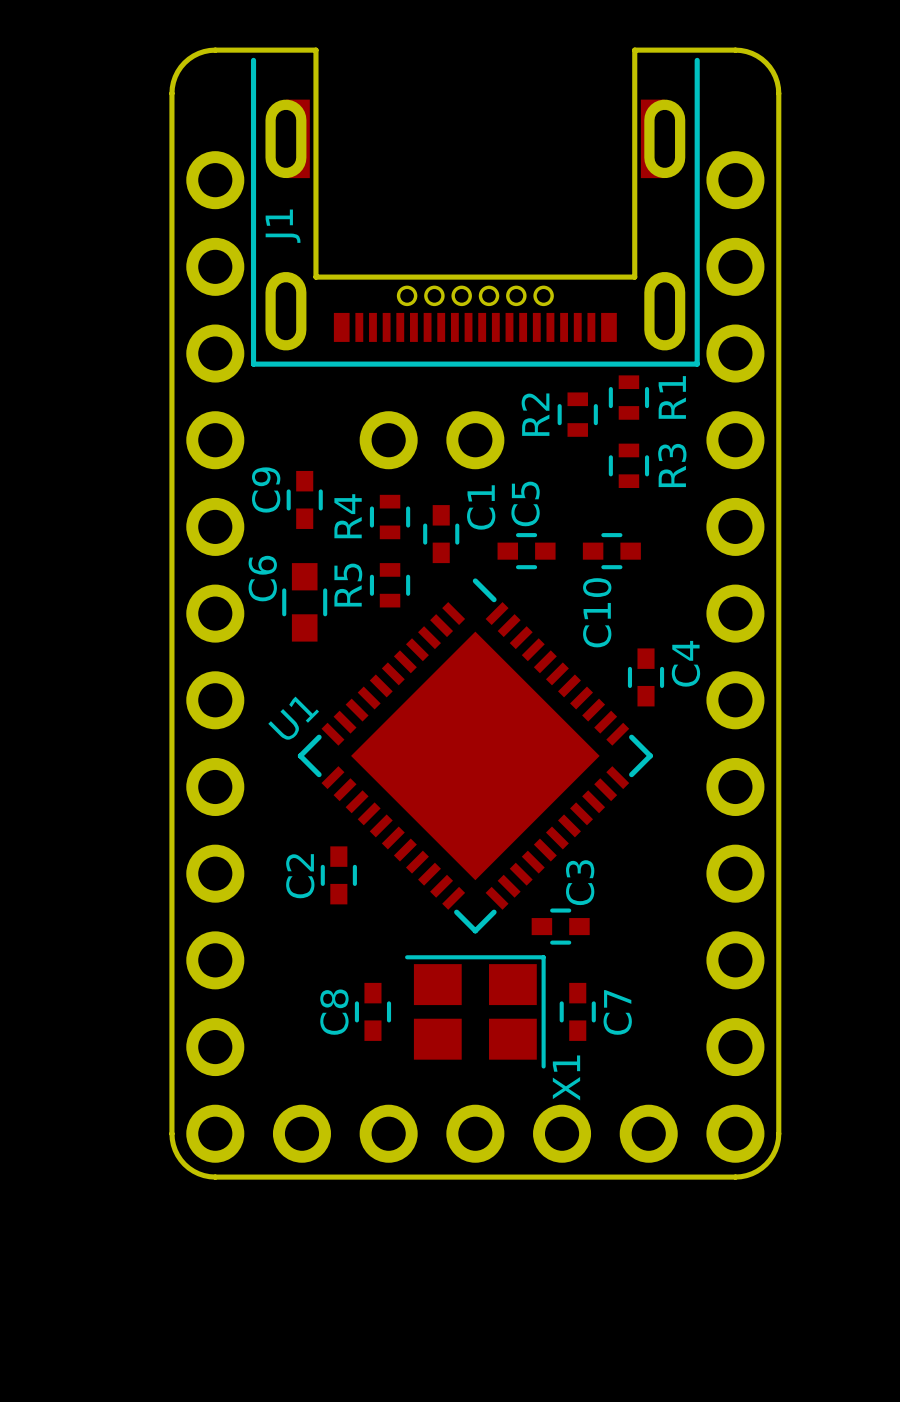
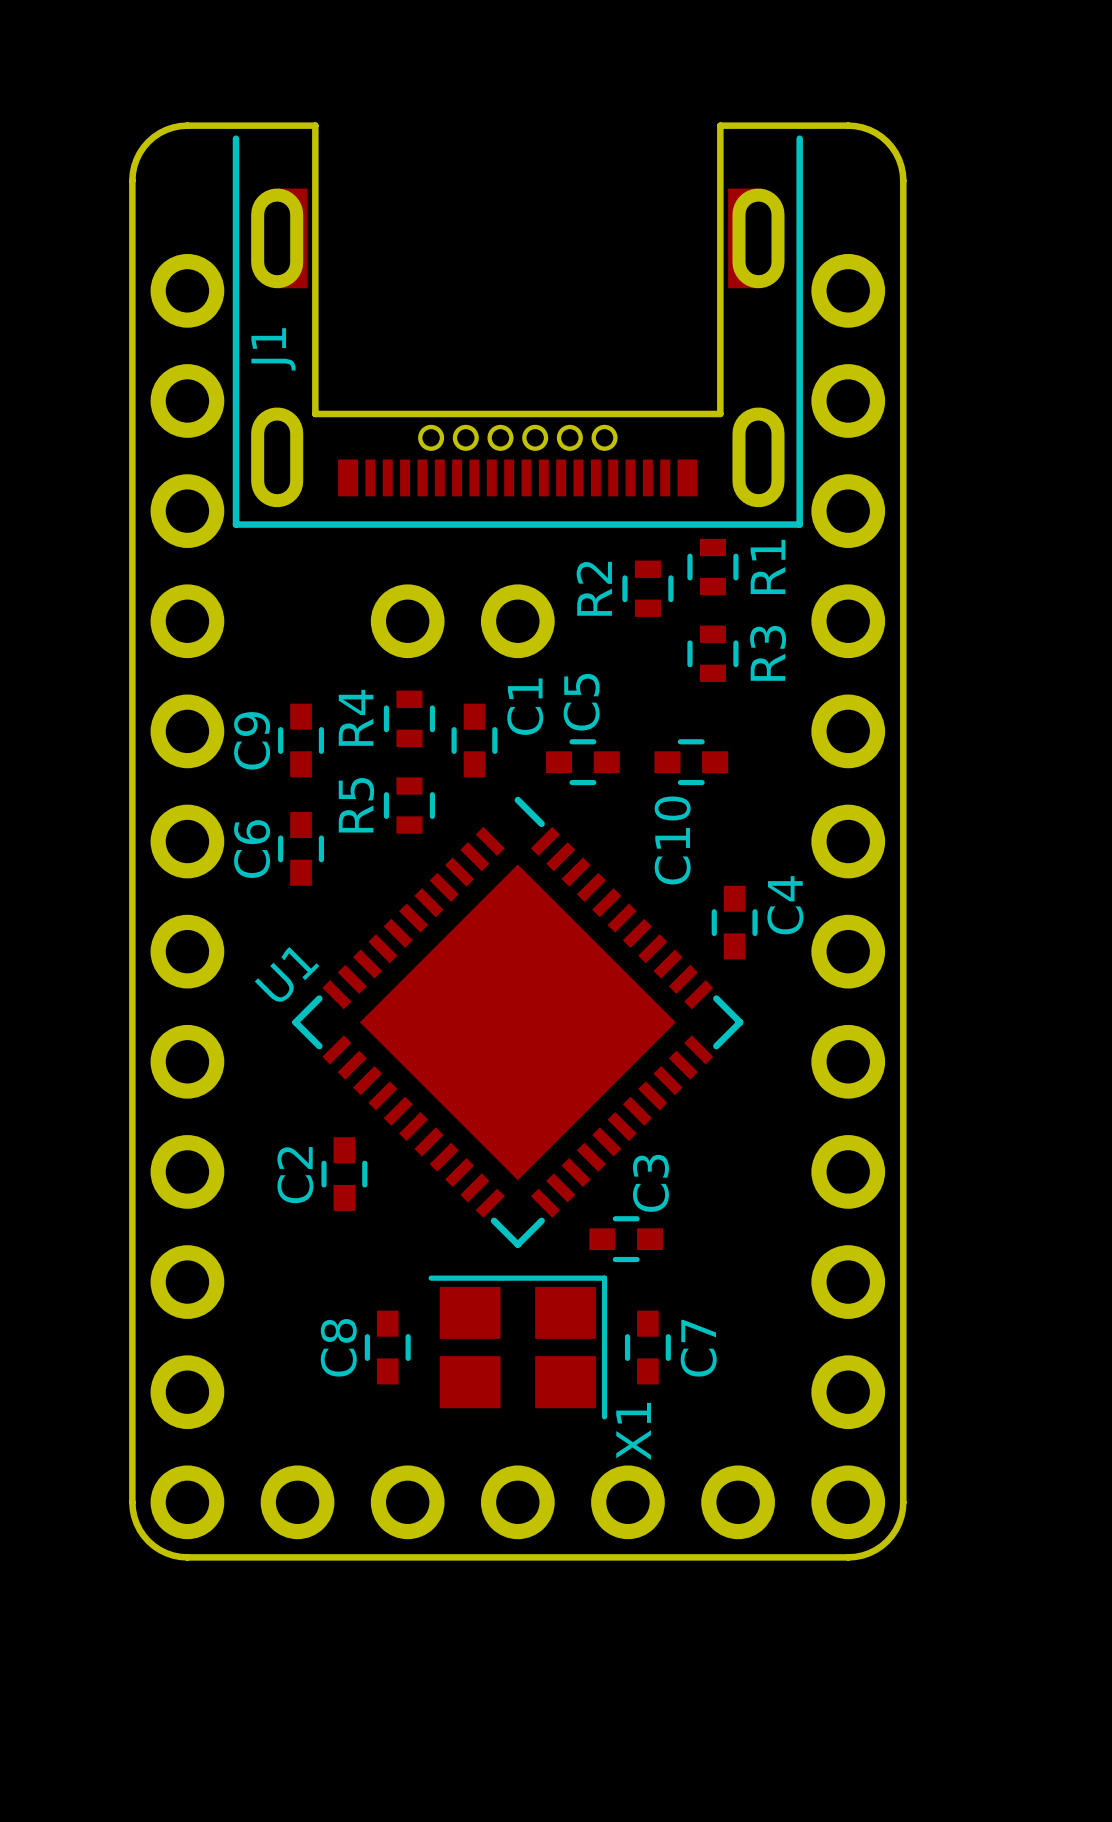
C9 name position: C9 (266, 489) -> C9 (252, 740)
C9 position: (304, 499) -> (301, 740)
C6 footprint: [282, 563, 328, 642] -> [278, 812, 325, 886]
C6 name position: C6 (262, 578) -> C6 (252, 849)

